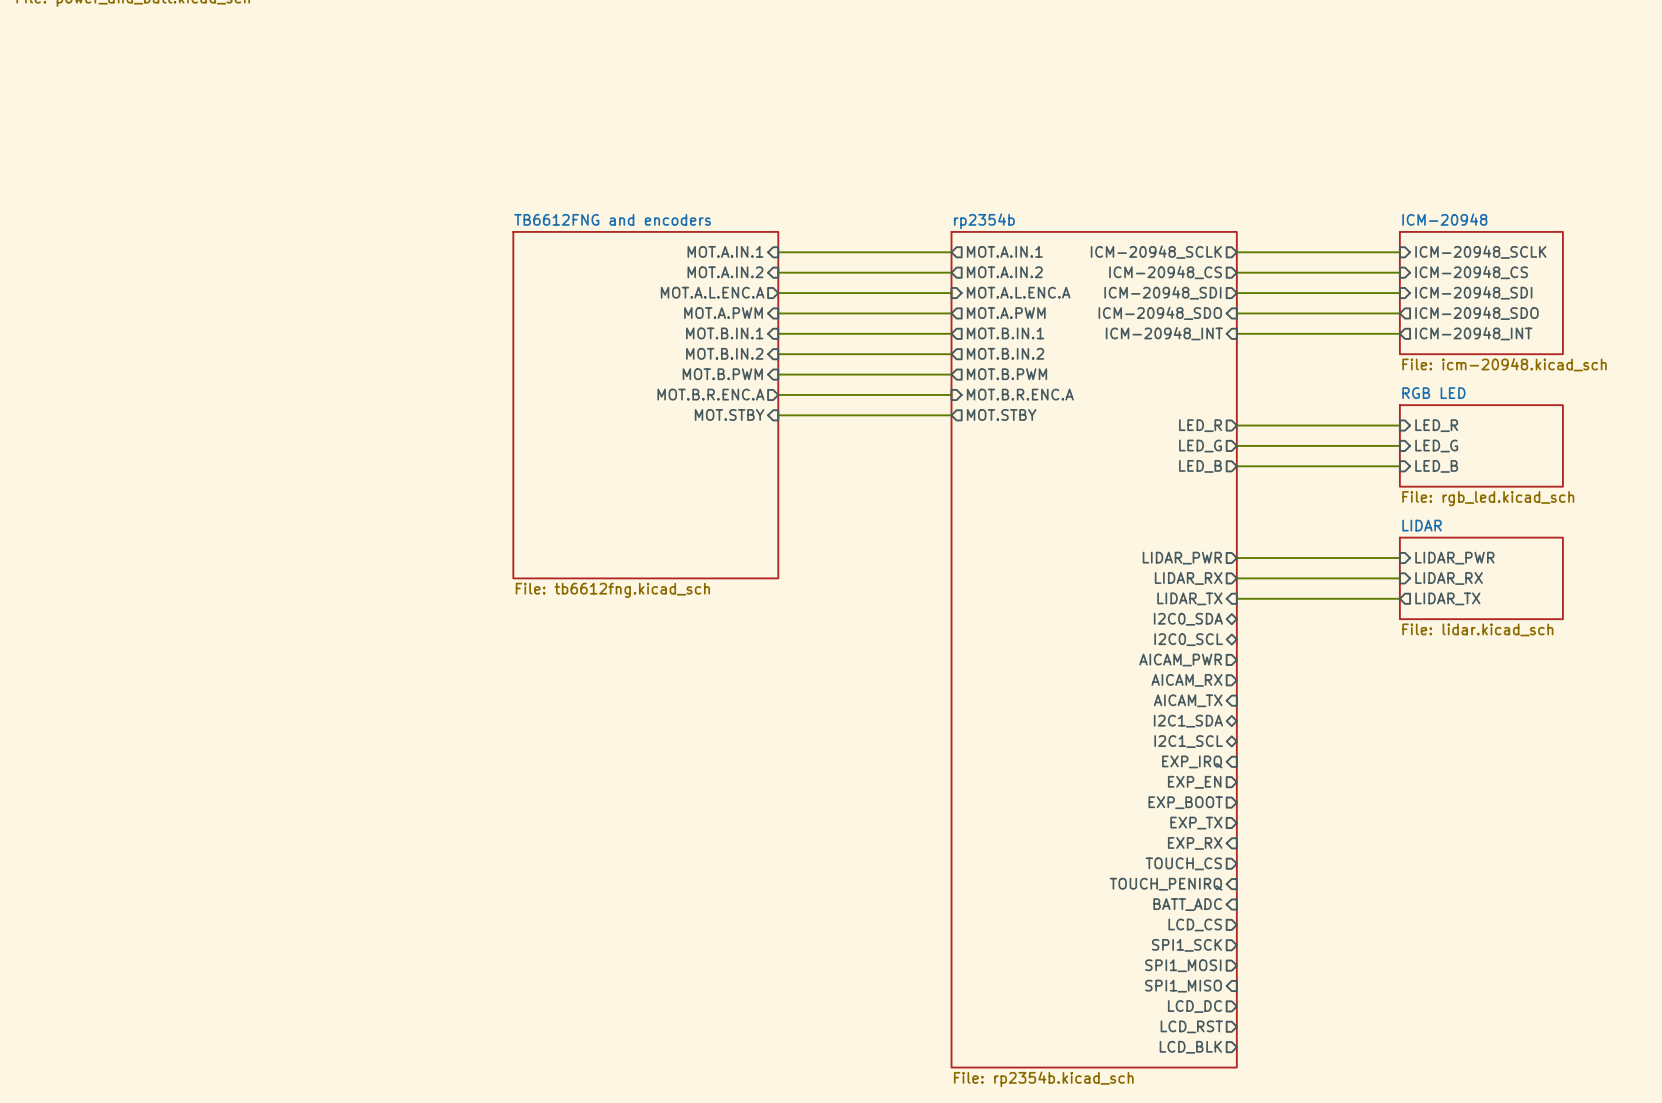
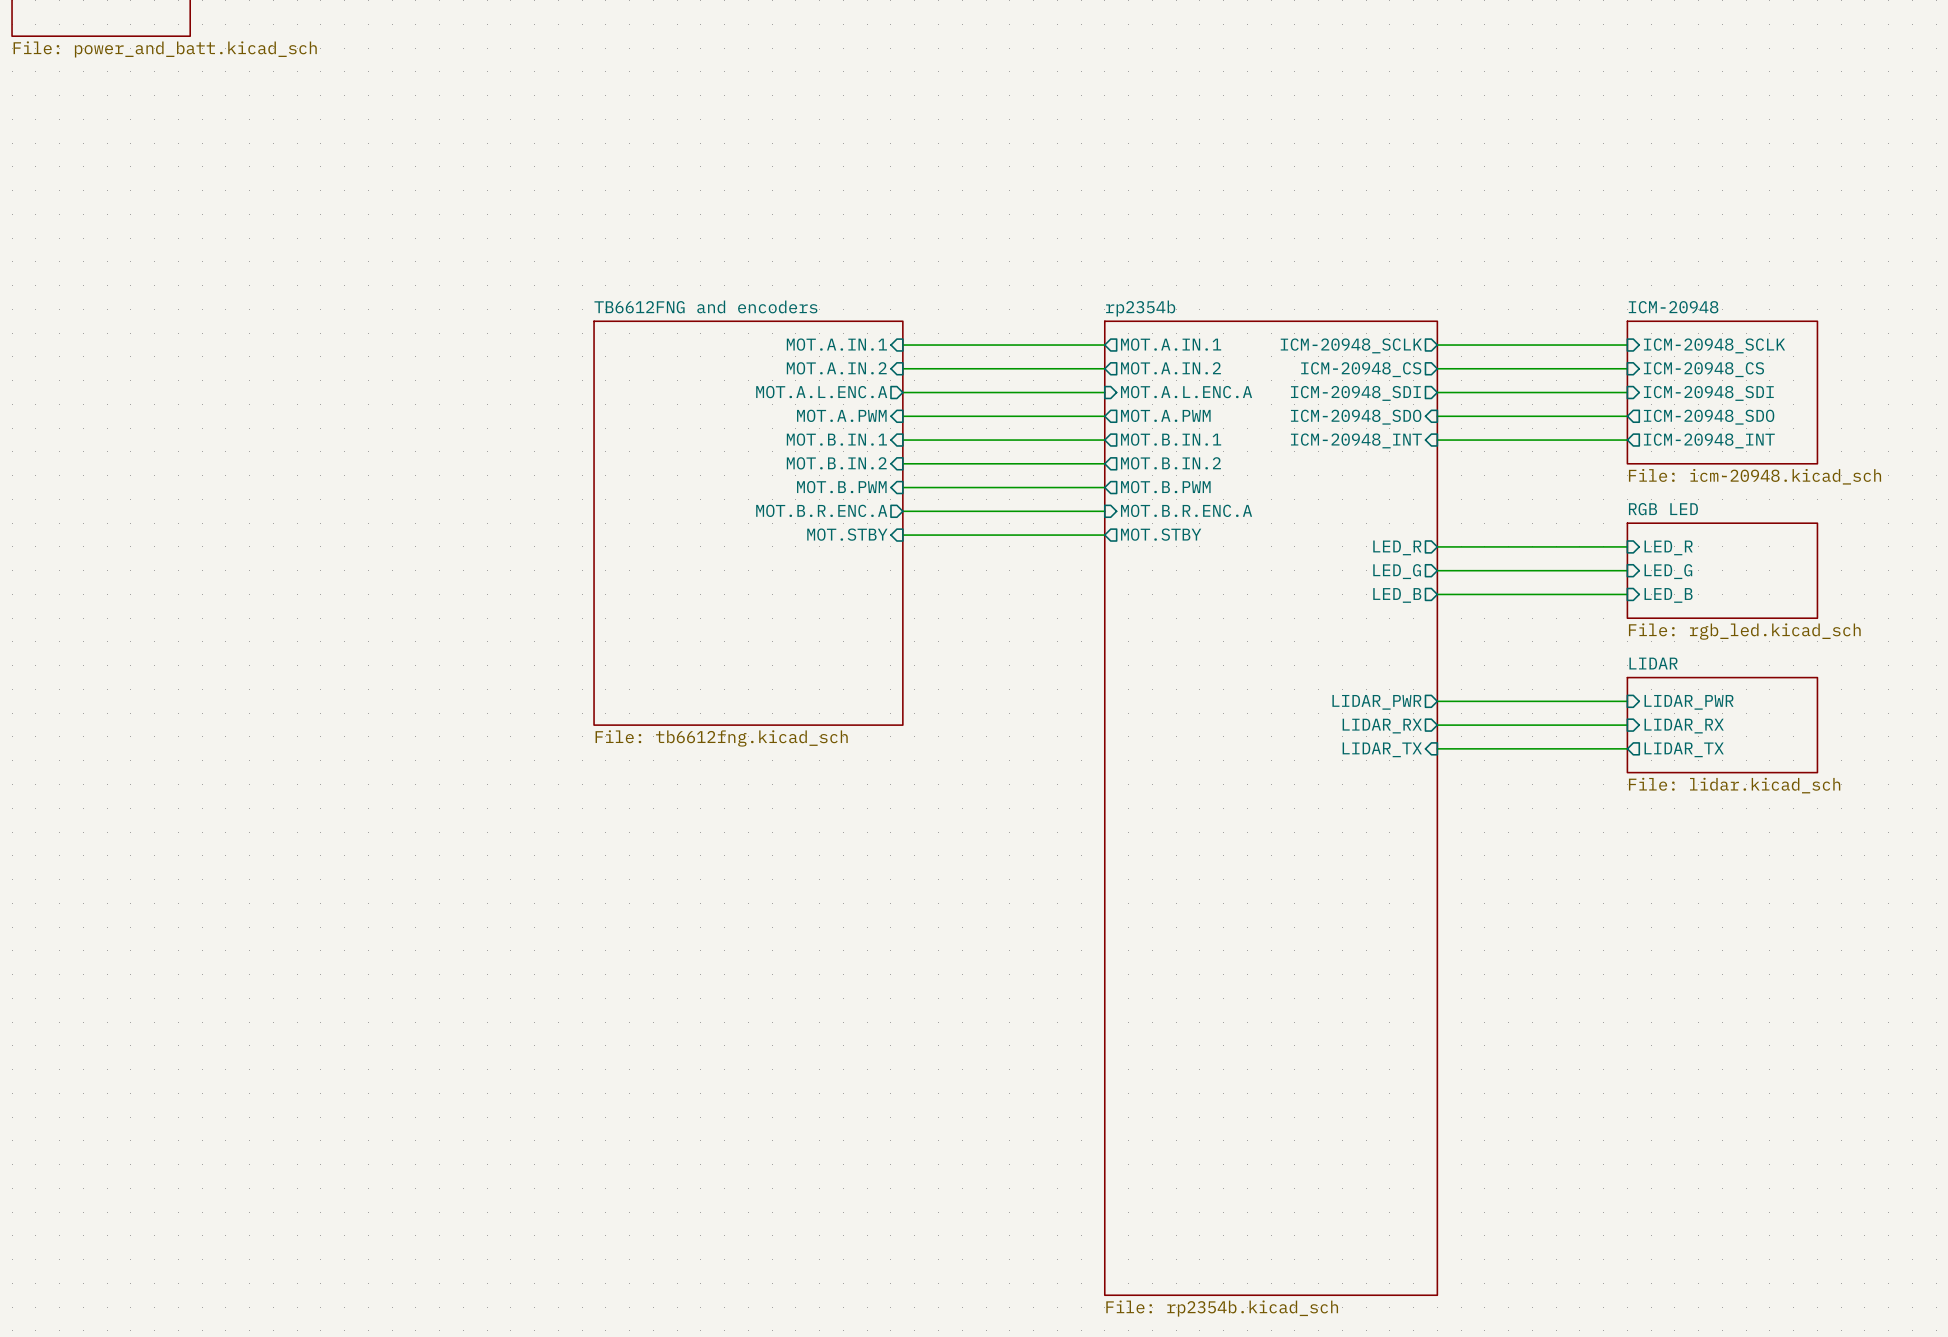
sheet pin: I2C0_SDA (1188, 619) -> none
sheet pin: I2C0_SCL (1188, 639) -> none
sheet pin: AICAM_PWR (1180, 660) -> none
sheet pin: AICAM_RX (1186, 680) -> none
sheet pin: AICAM_TX (1188, 700) -> none
sheet pin: I2C1_SDA (1188, 721) -> none
sheet pin: I2C1_SCL (1188, 741) -> none
sheet pin: EXP_IRQ (1192, 761) -> none
sheet pin: EXP_EN (1194, 782) -> none
sheet pin: EXP_BOOT (1185, 802) -> none
sheet pin: EXP_TX (1196, 823) -> none
sheet pin: EXP_RX (1195, 843) -> none
sheet pin: TOUCH_CS (1183, 863) -> none
sheet pin: TOUCH_PENIRQ (1166, 884) -> none
sheet pin: BATT_ADC (1187, 904) -> none
sheet pin: LCD_CS (1195, 924) -> none
sheet pin: SPI1_SCK (1186, 945) -> none
sheet pin: SPI1_MOSI (1183, 965) -> none
sheet pin: SPI1_MISO (1183, 986) -> none
sheet pin: LCD_DC (1194, 1006) -> none
sheet pin: LCD_RST (1191, 1026) -> none
sheet pin: LCD_BLK (1190, 1047) -> none

